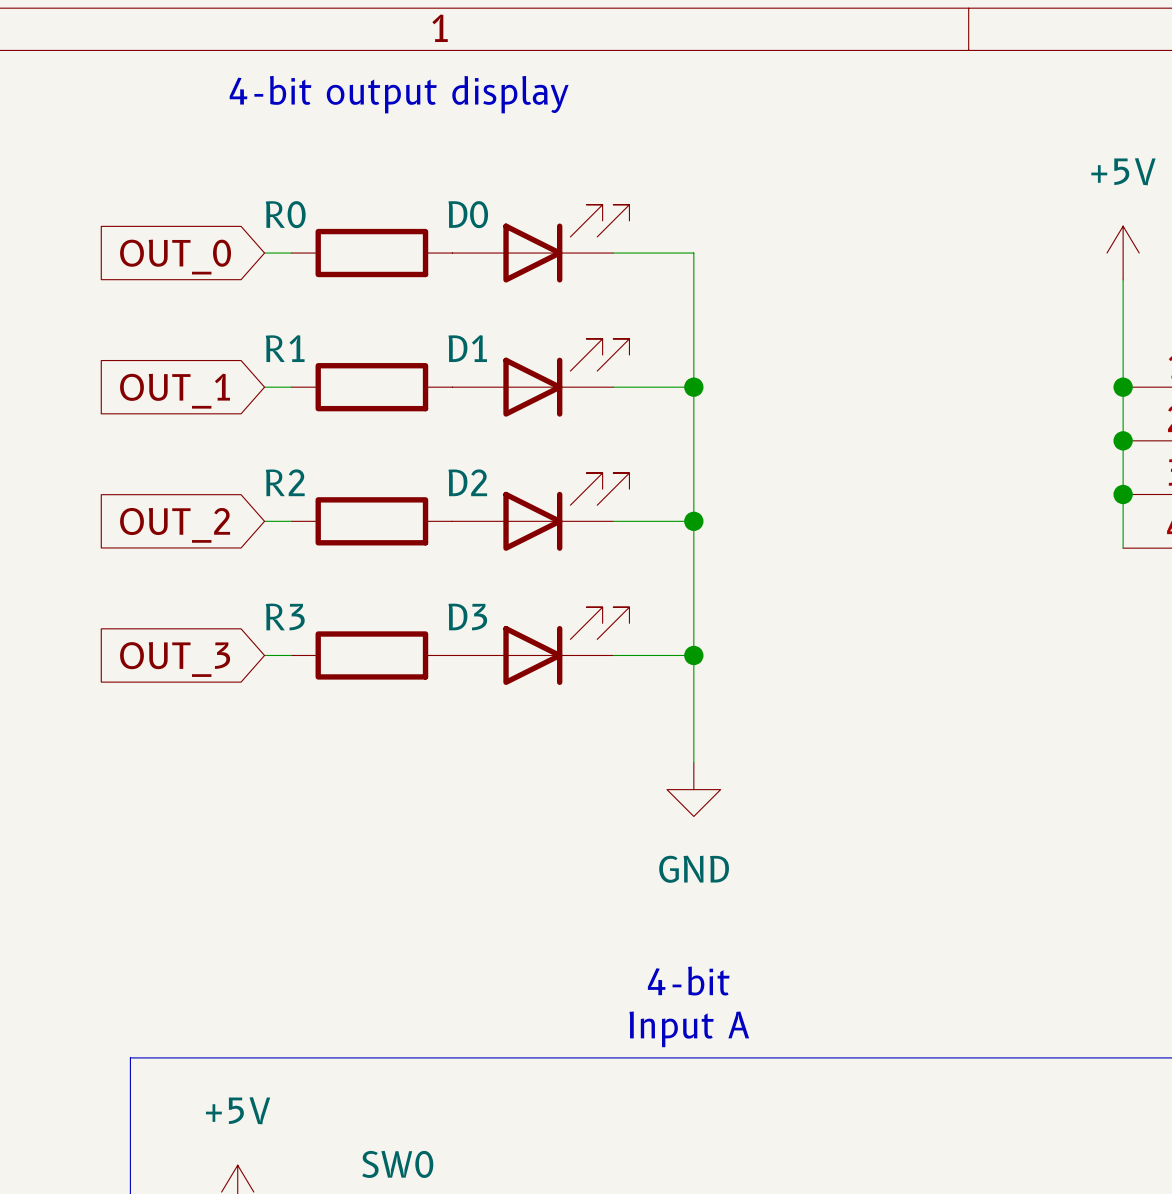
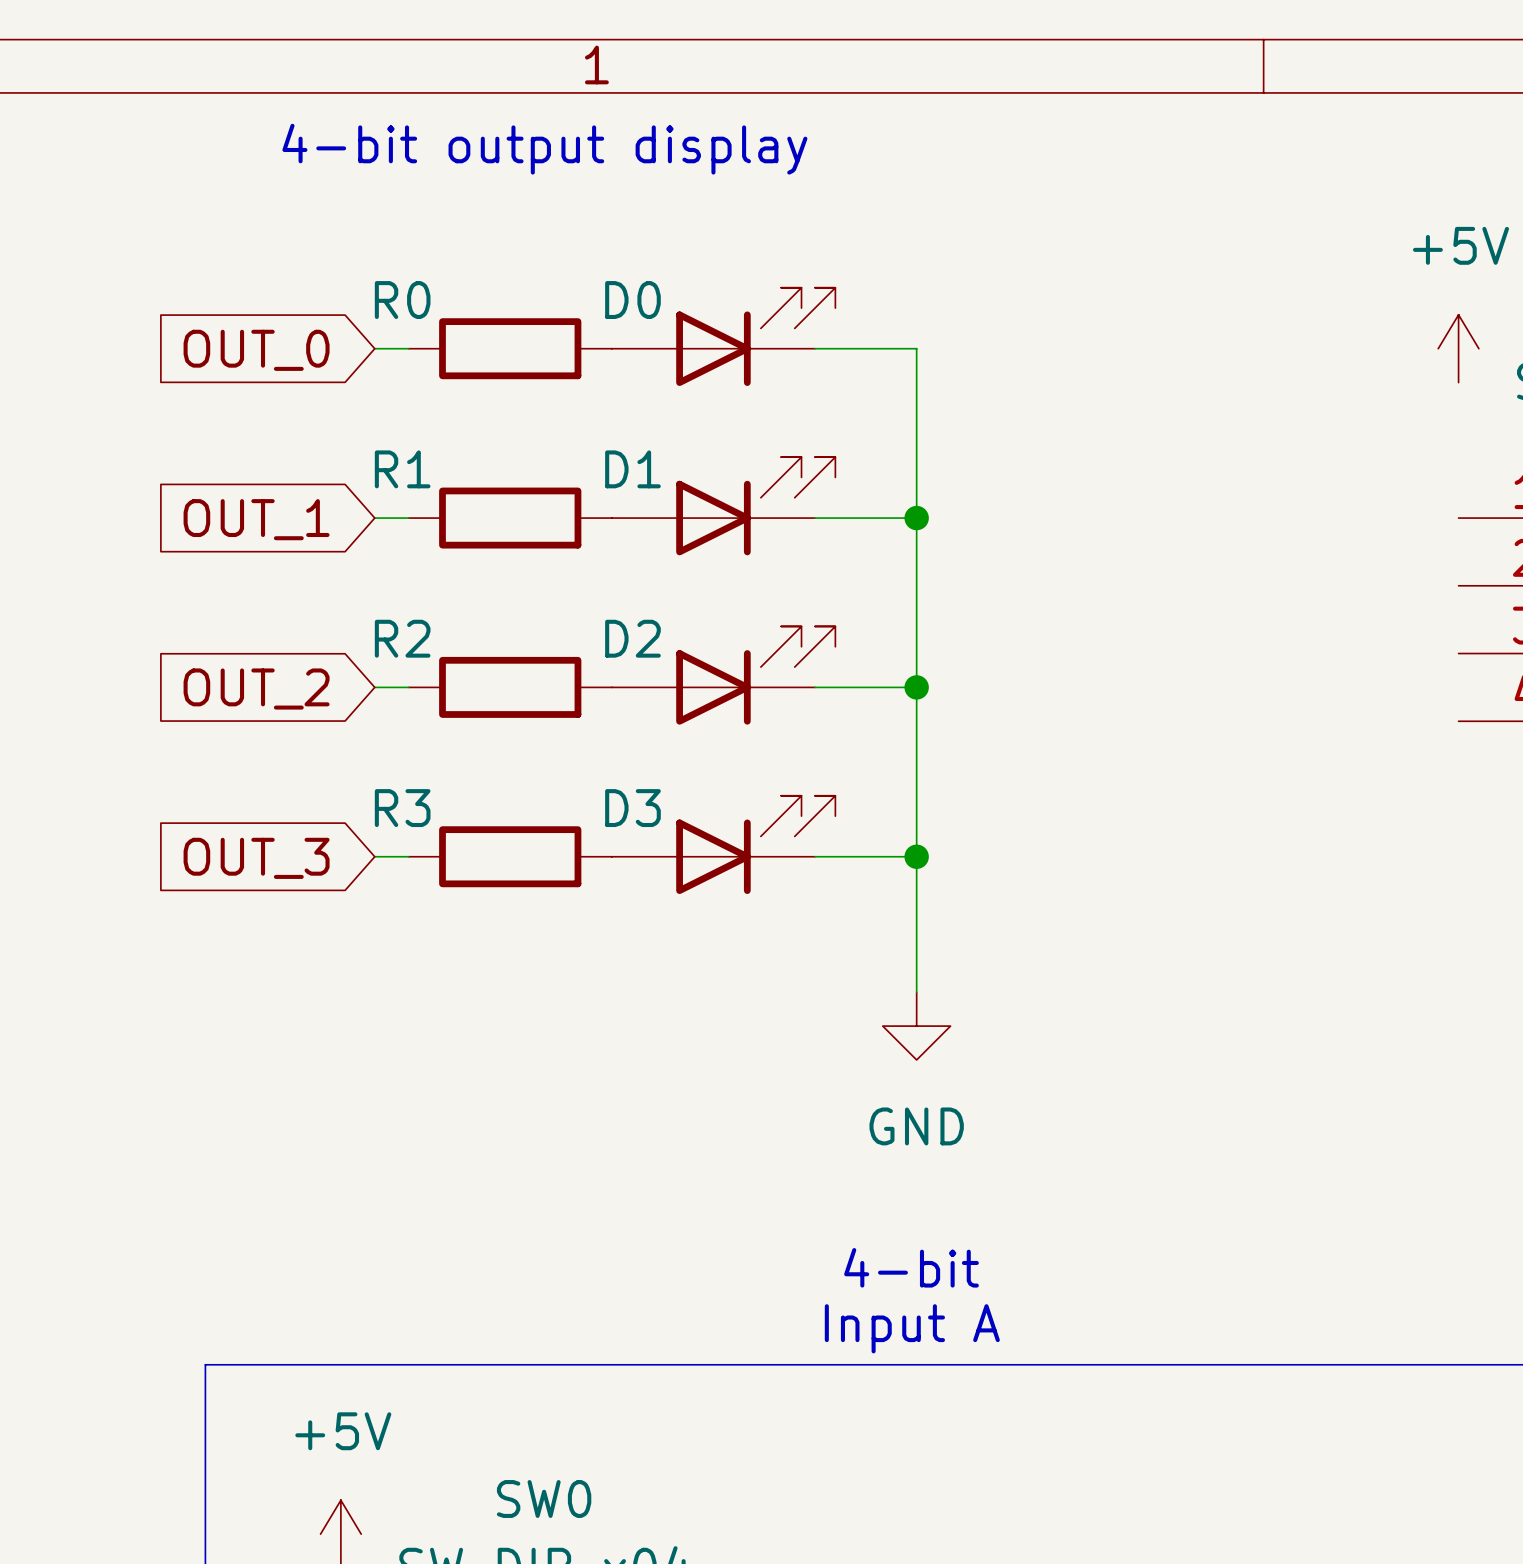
wire: (1123, 279) (1123, 548) -> none
junction: (1123, 387) -> none
junction: (1123, 440) -> none
junction: (1123, 494) -> none

